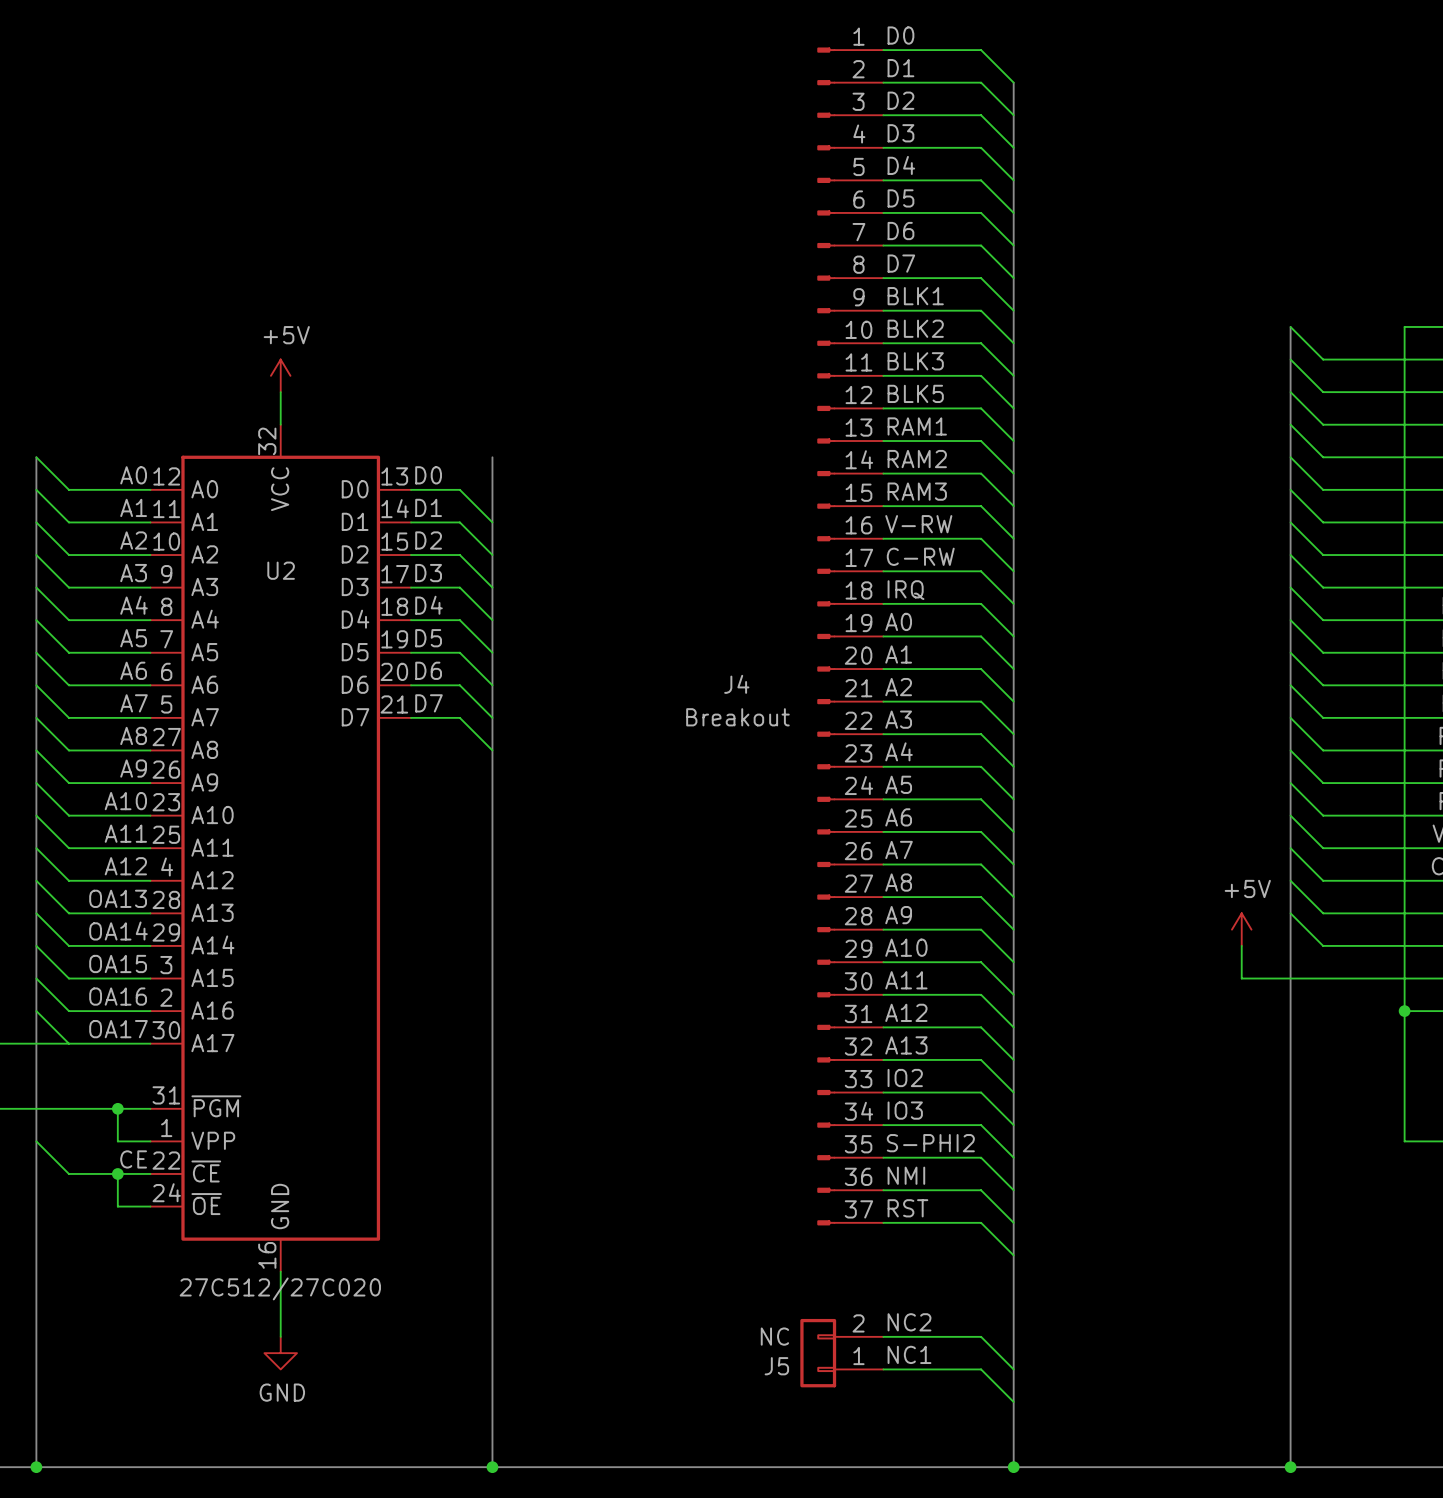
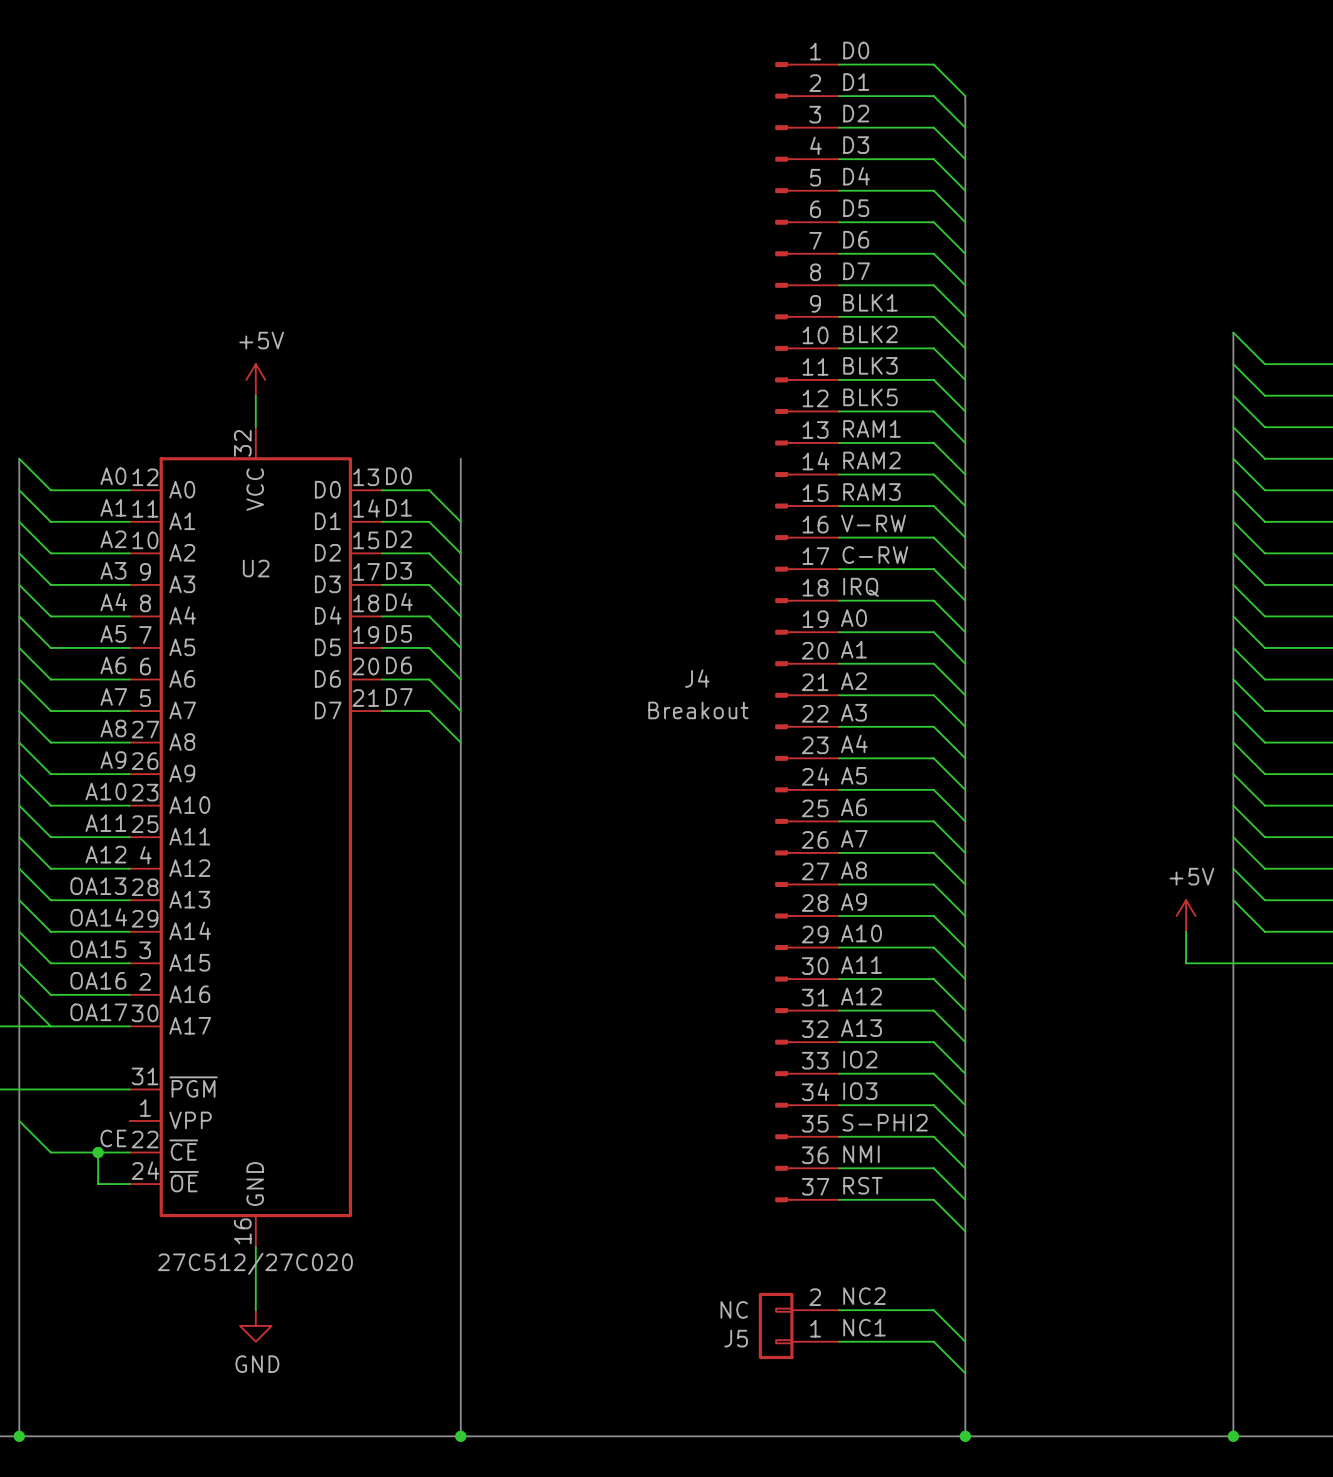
wire: (117, 1108) (117, 1141) (150, 1141) -> none
junction: (117, 1108) -> none

